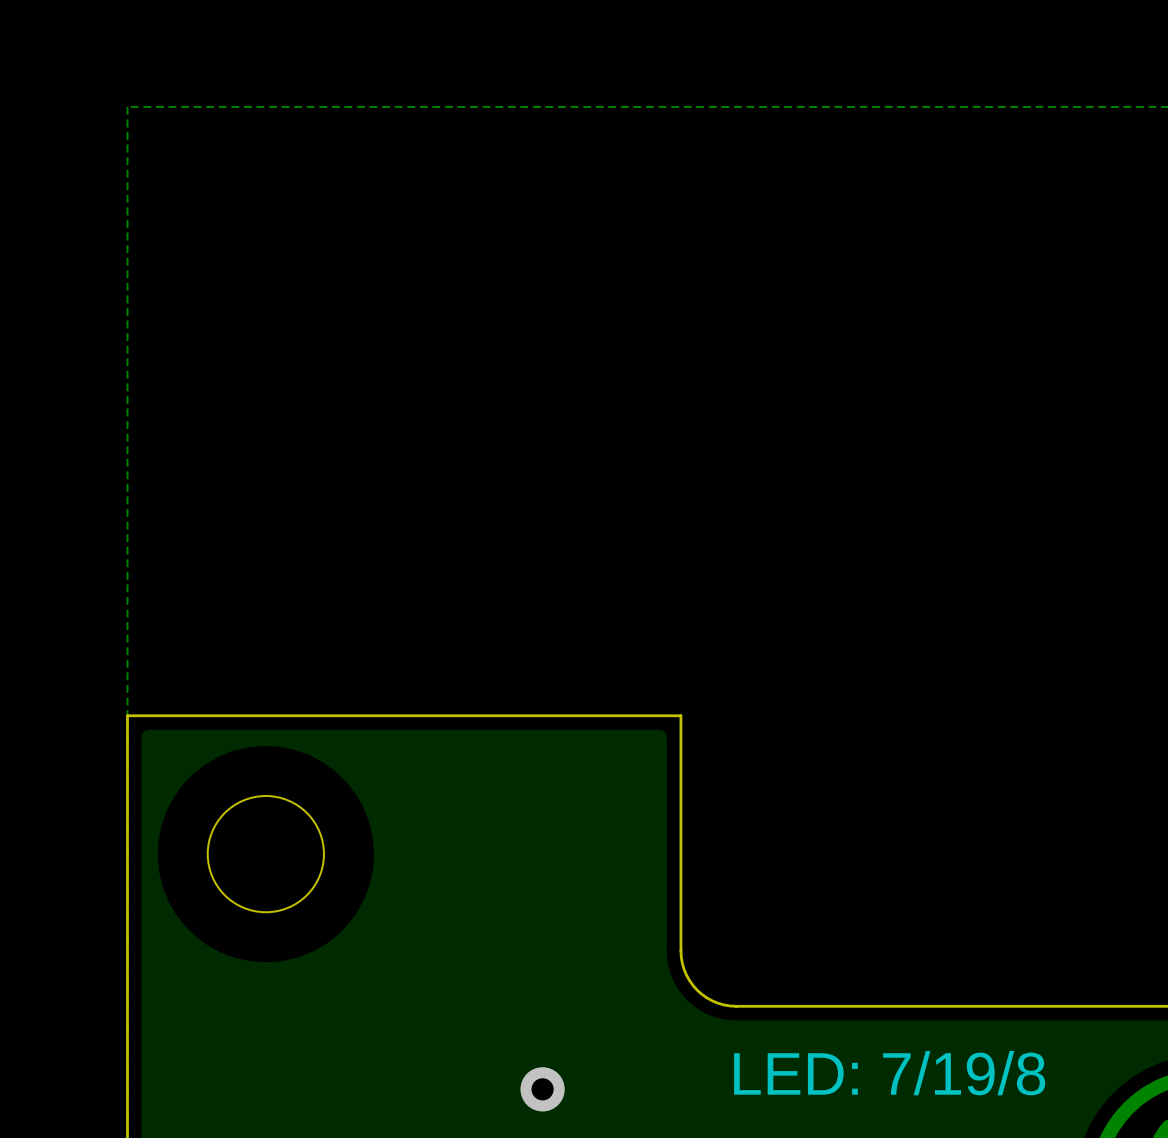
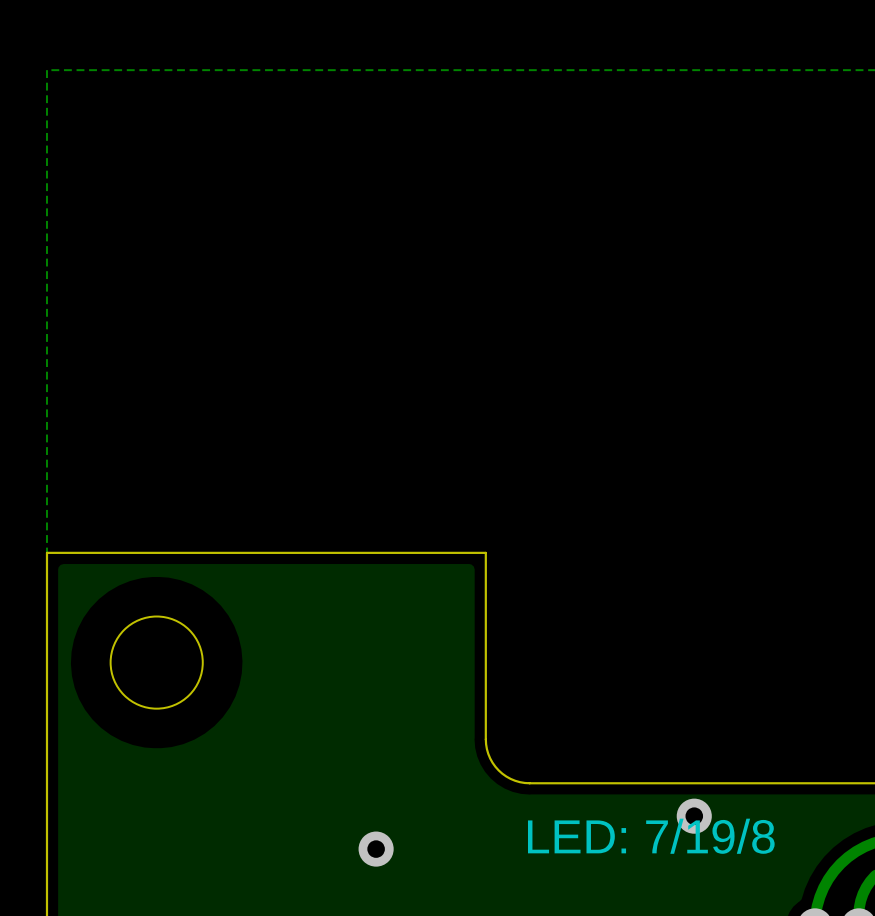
via: none -> (694, 816)

